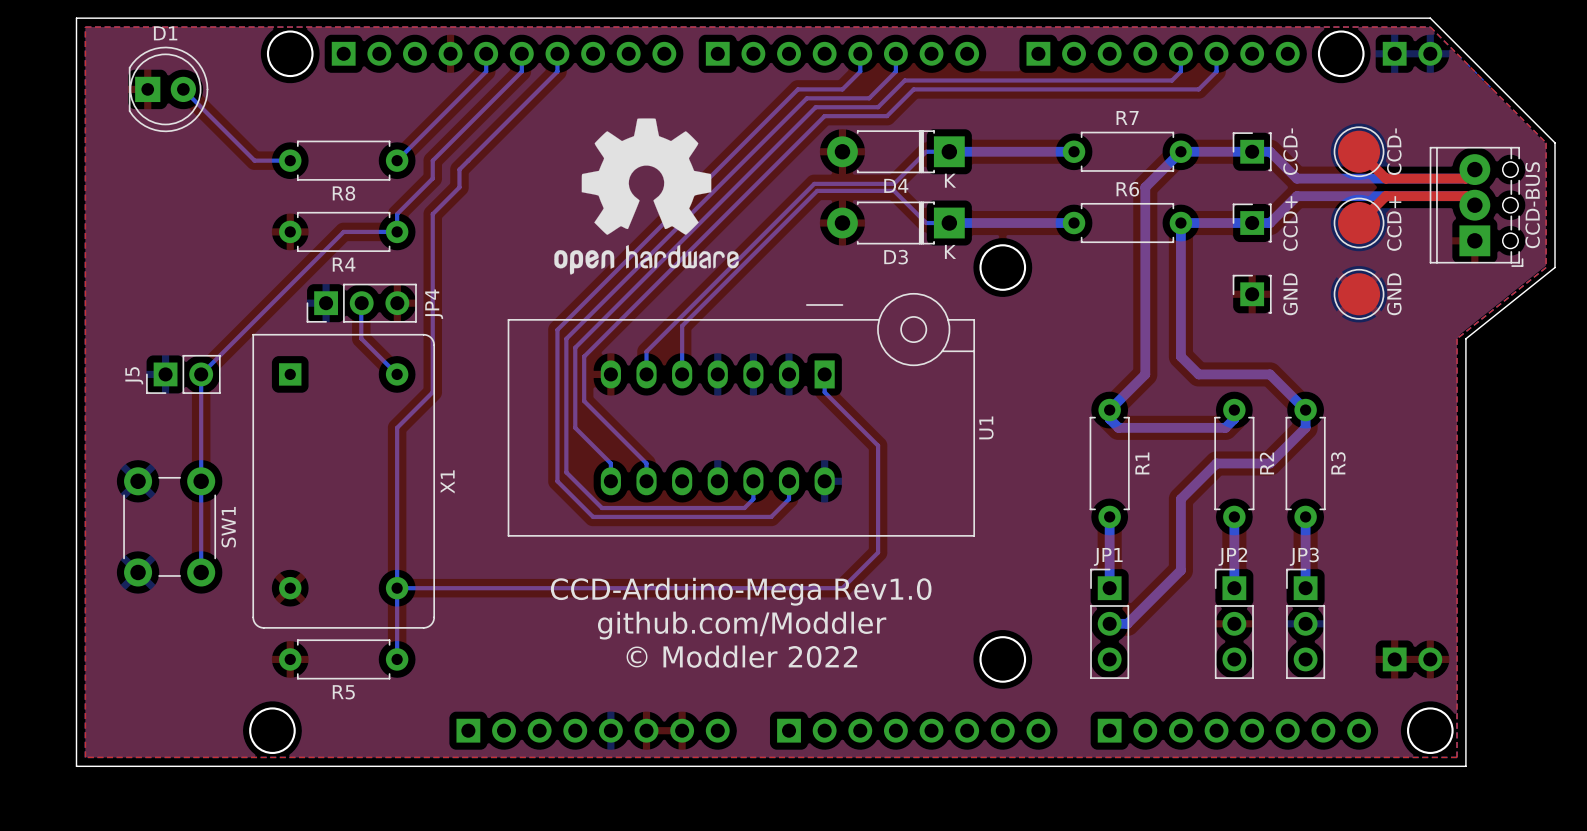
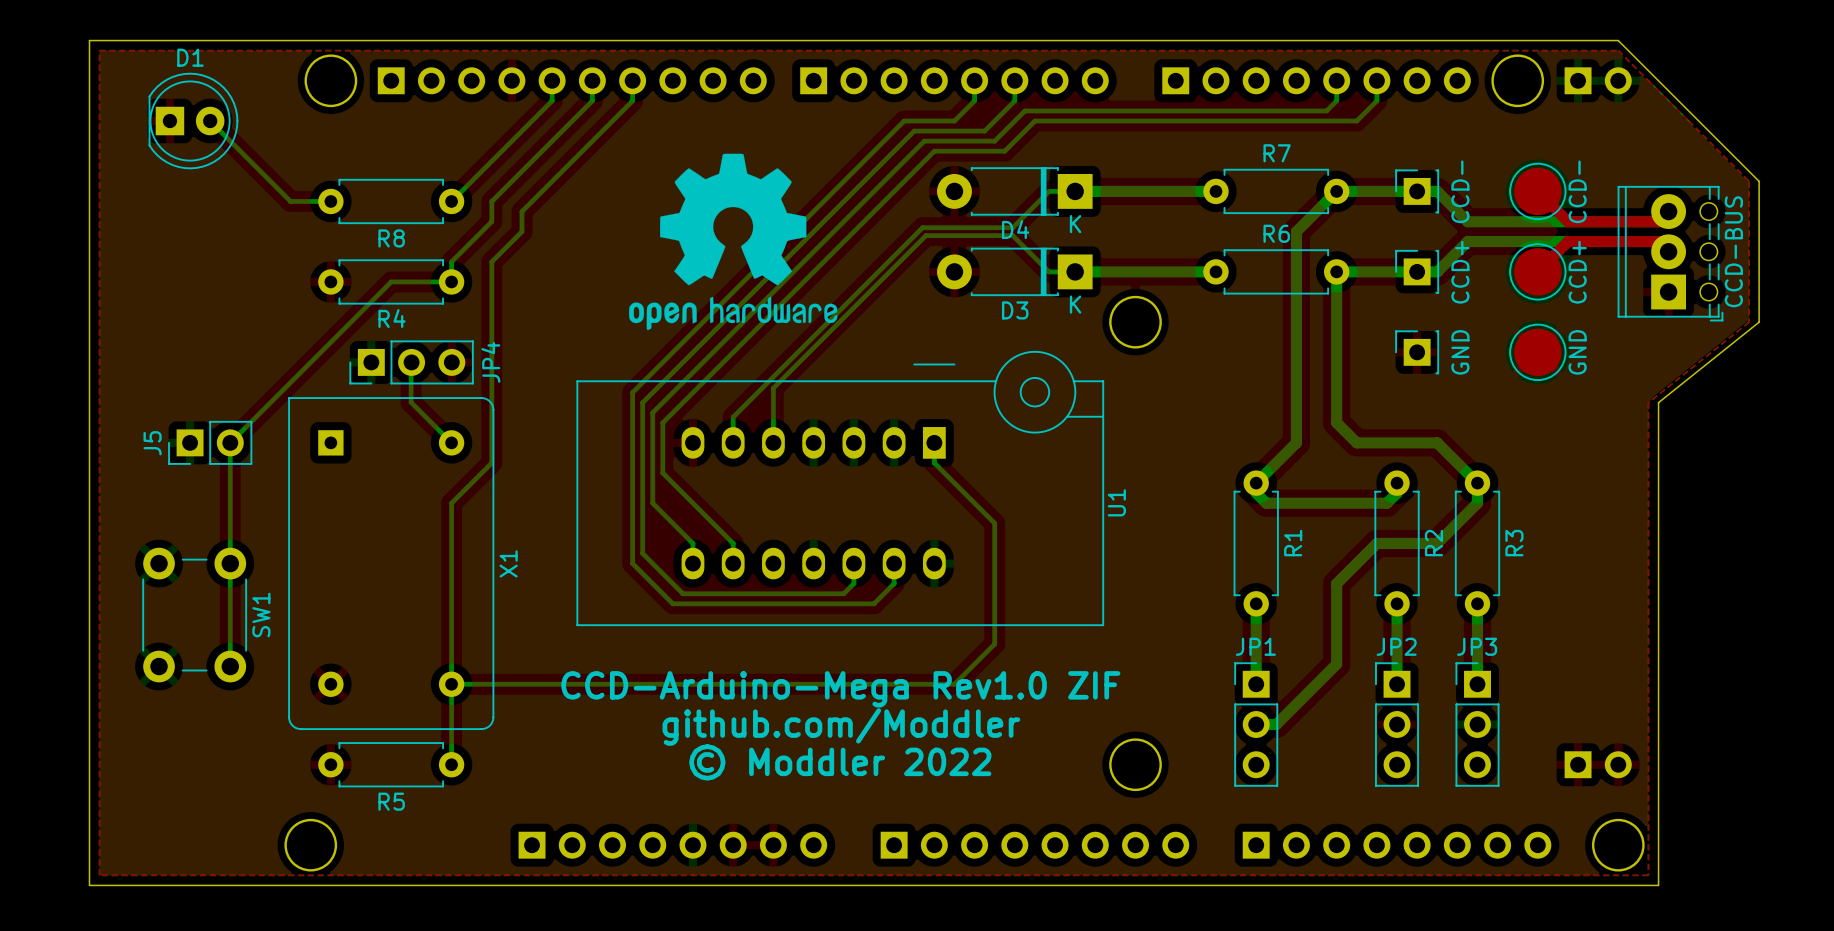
text: CCD-Arduino-Mega Rev1.0 (741, 591) -> CCD-Arduino-Mega Rev1.0 ZIF (840, 689)

